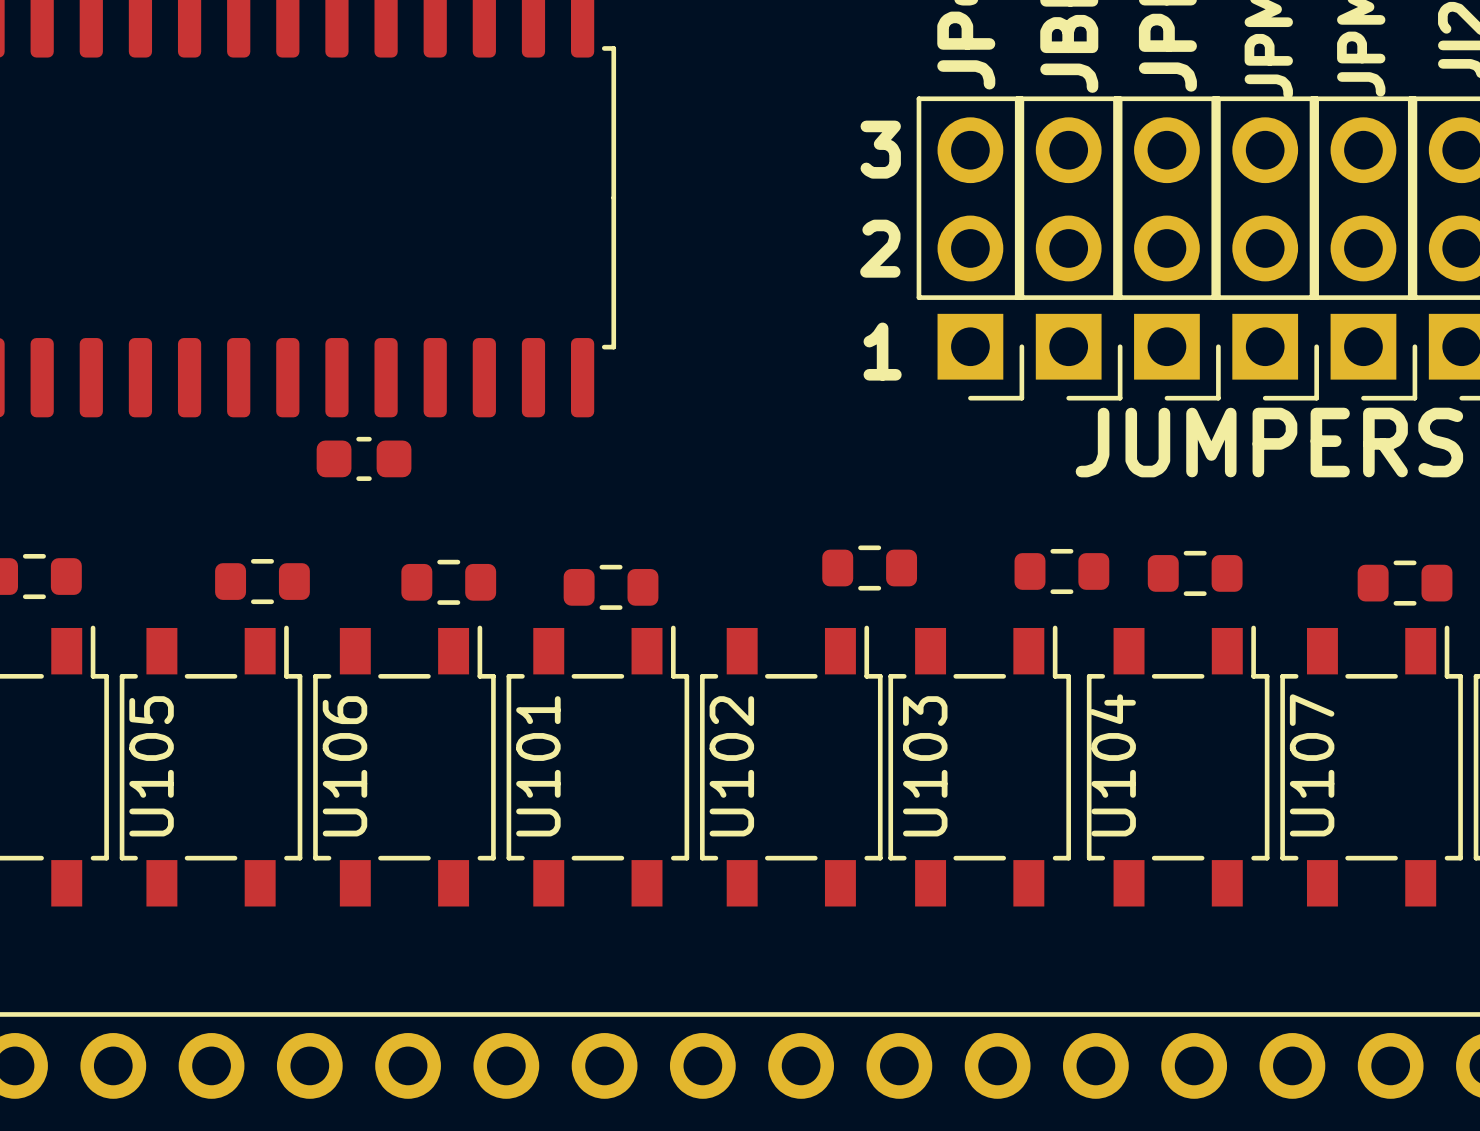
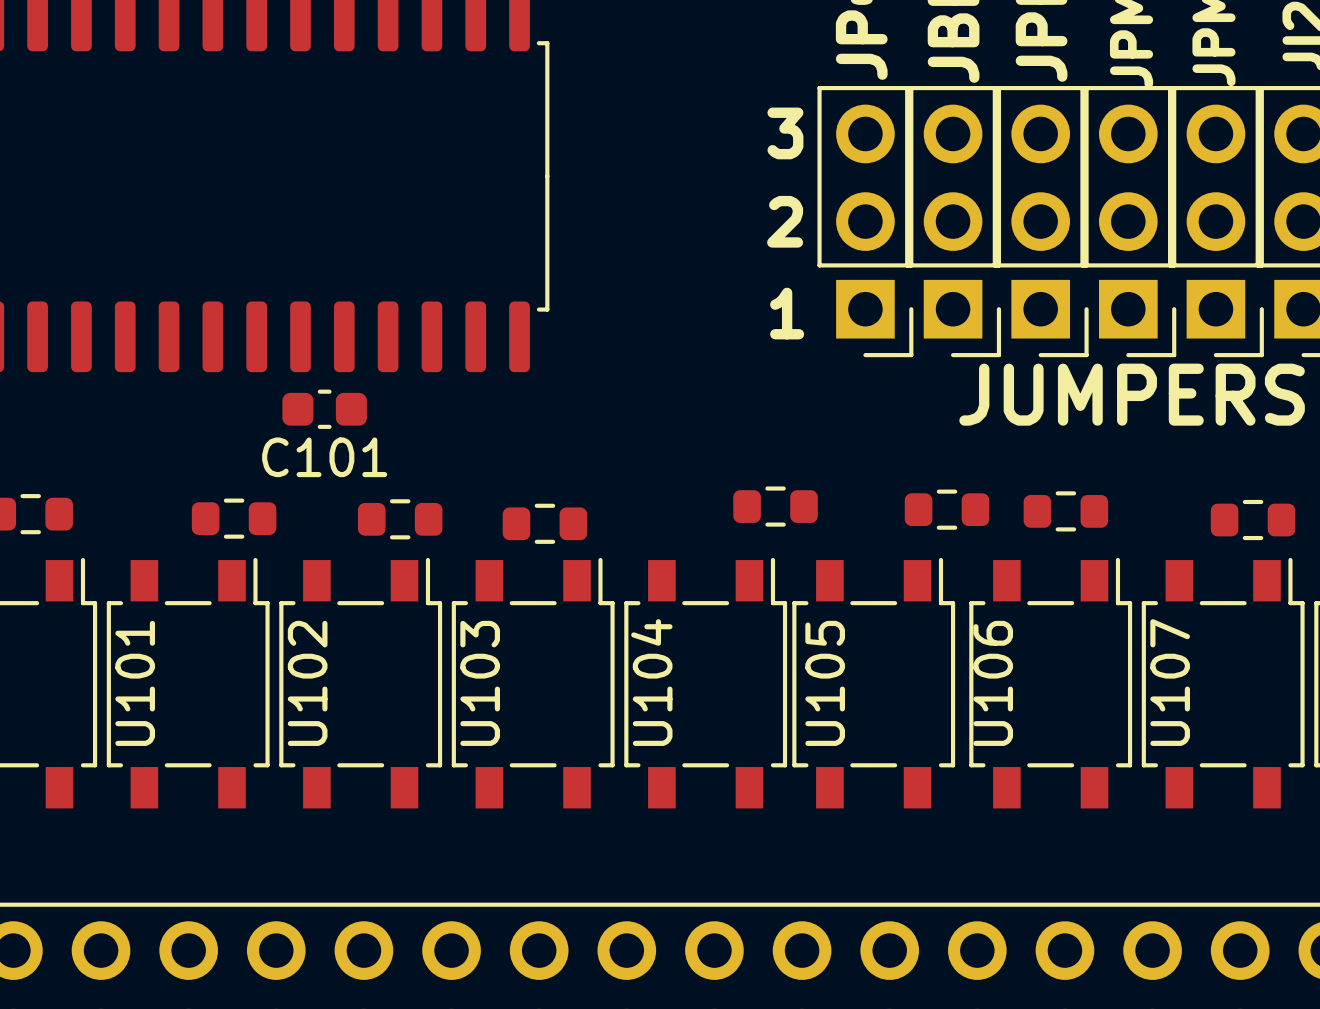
C101 name: none -> C101 (324, 457)
U104 name: U104 (1112, 765) -> U106 (993, 683)
U105 name: U105 (151, 766) -> U101 (135, 683)
U106 name: U106 (344, 766) -> U102 (307, 683)
U101 name: U101 (538, 766) -> U103 (480, 683)
U102 name: U102 (731, 766) -> U104 (651, 682)
U103 name: U103 (925, 766) -> U105 (825, 683)

